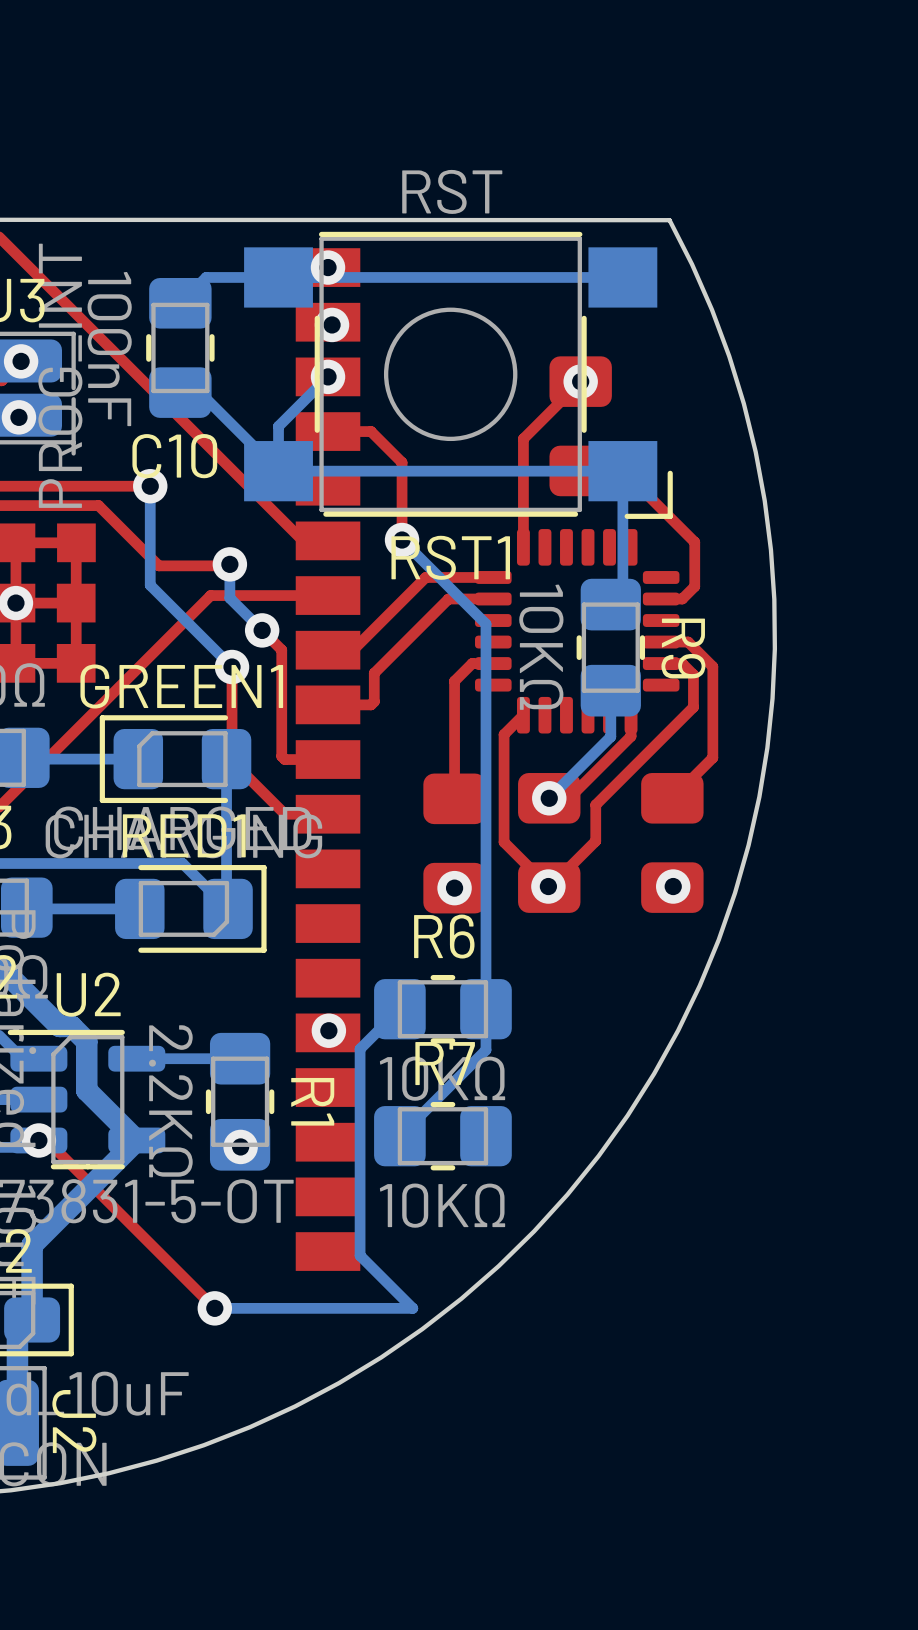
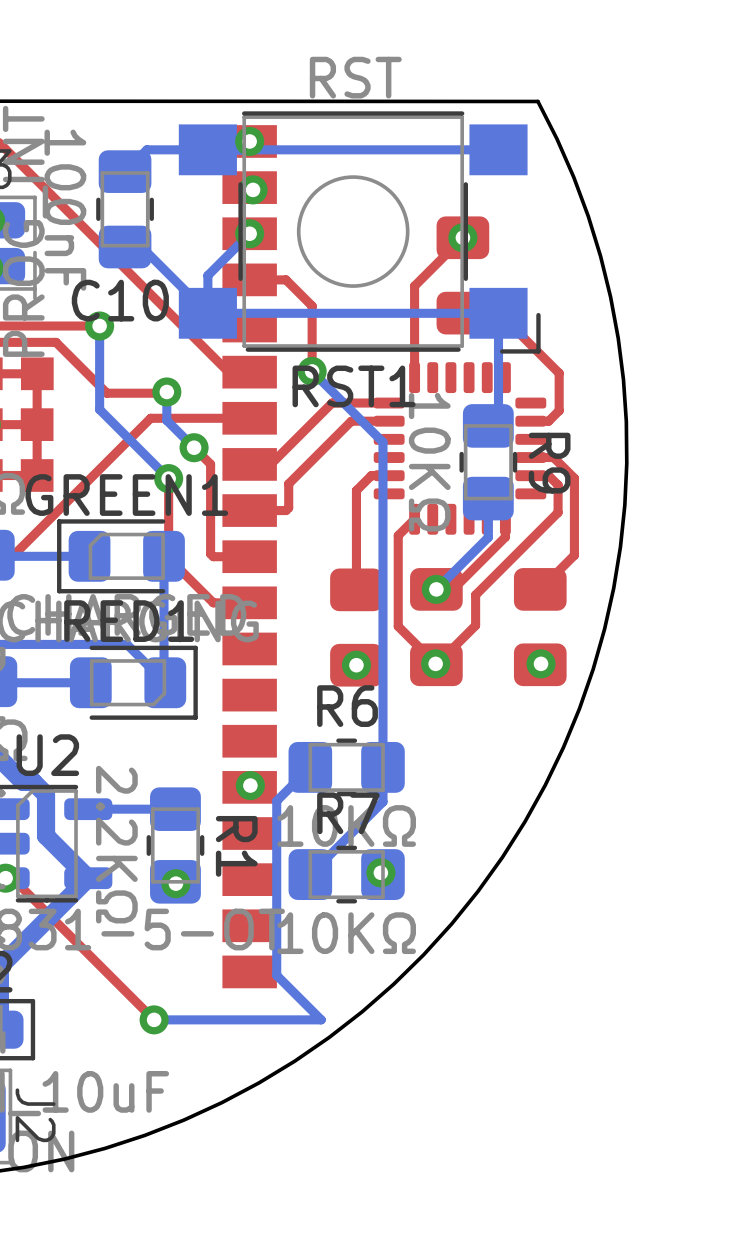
via: none -> (380, 872)

